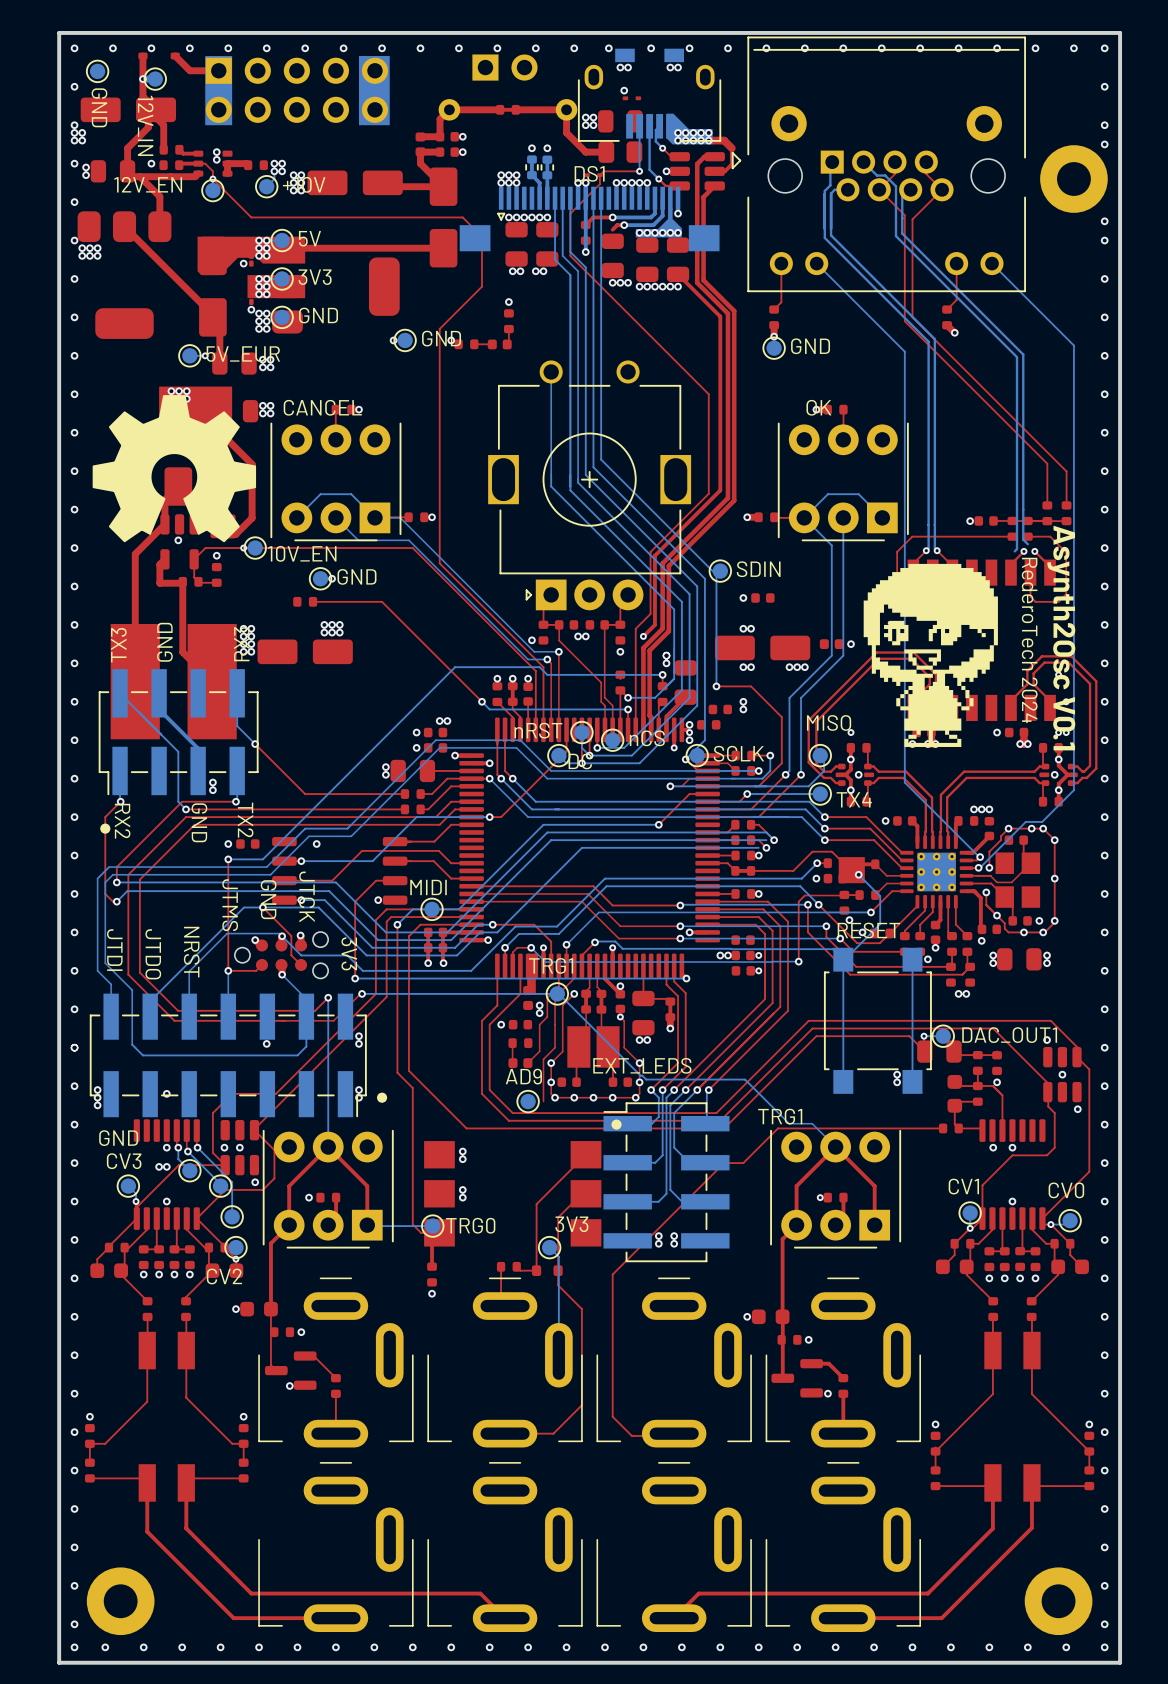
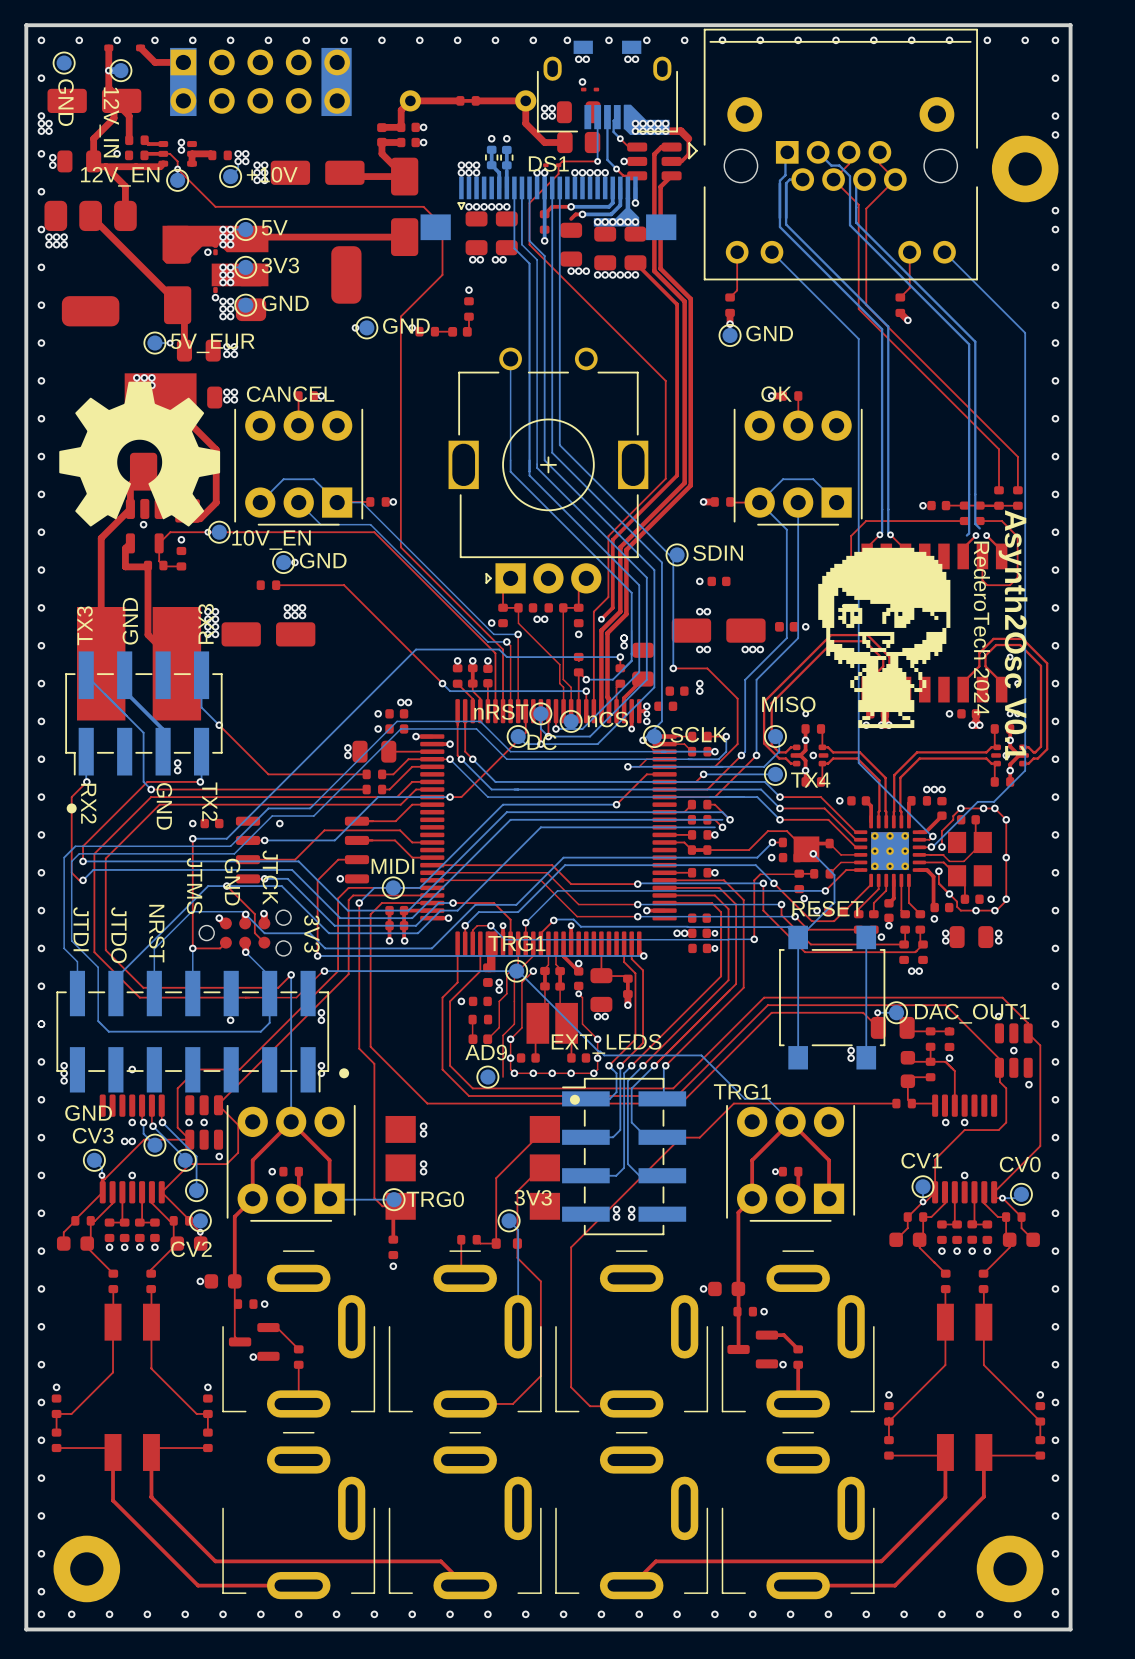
part: (504, 67) -> none

